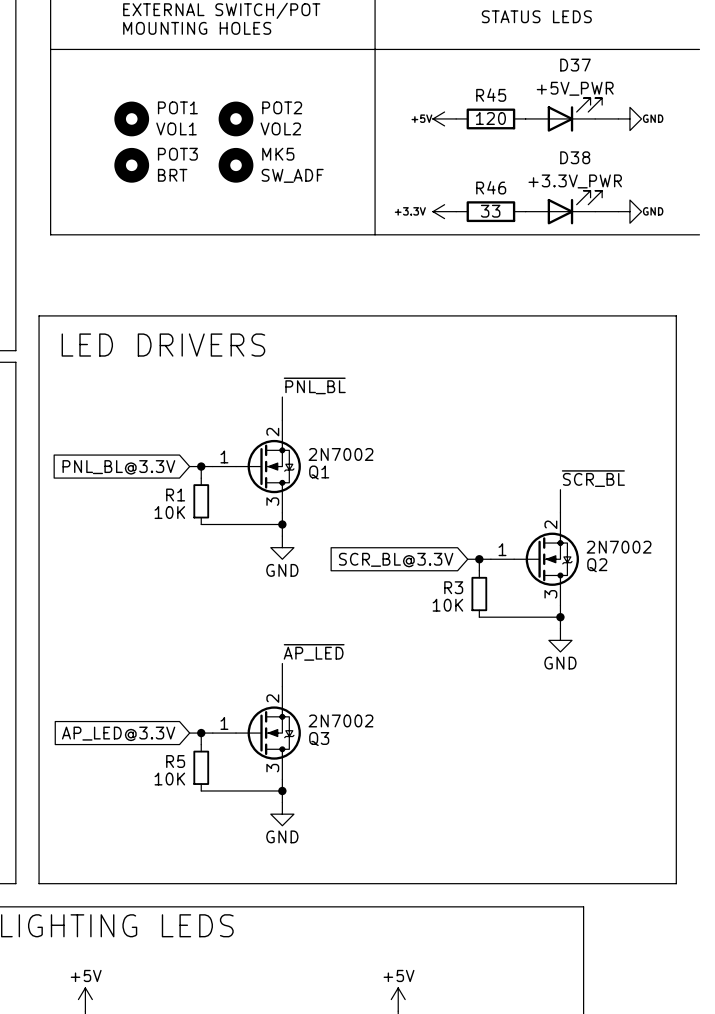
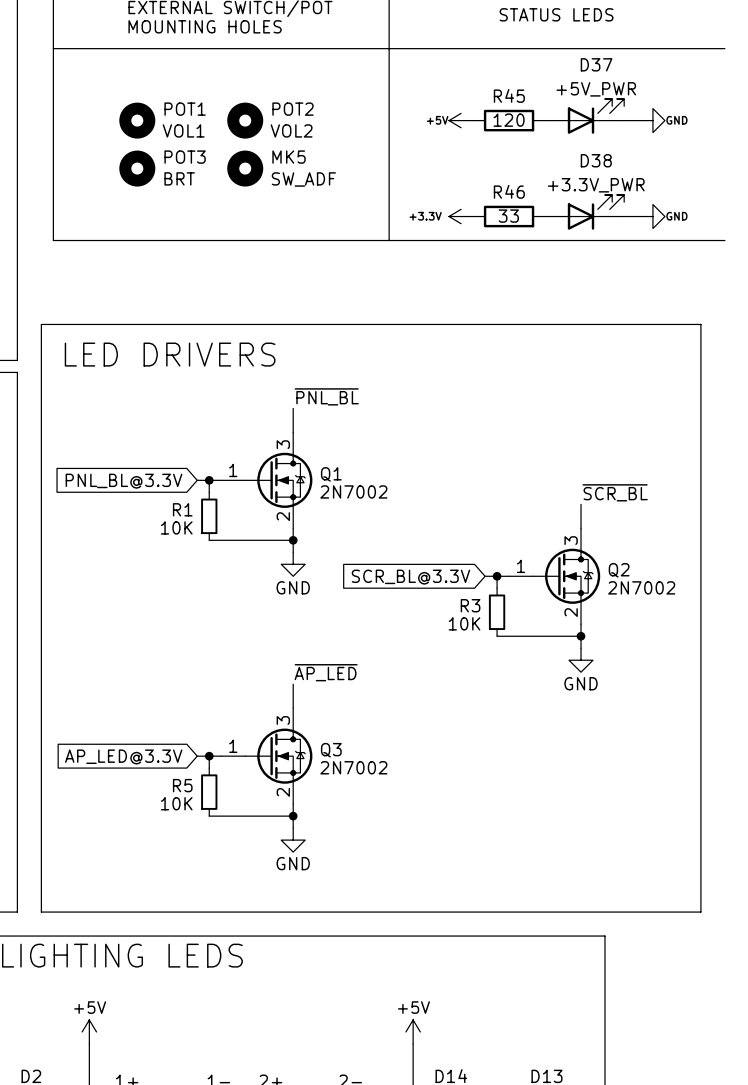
Q1 flip: as is (268, 466) -> up-down (278, 480)
Q2 flip: as is (546, 559) -> up-down (566, 576)
Q3 flip: as is (268, 733) -> up-down (278, 756)

